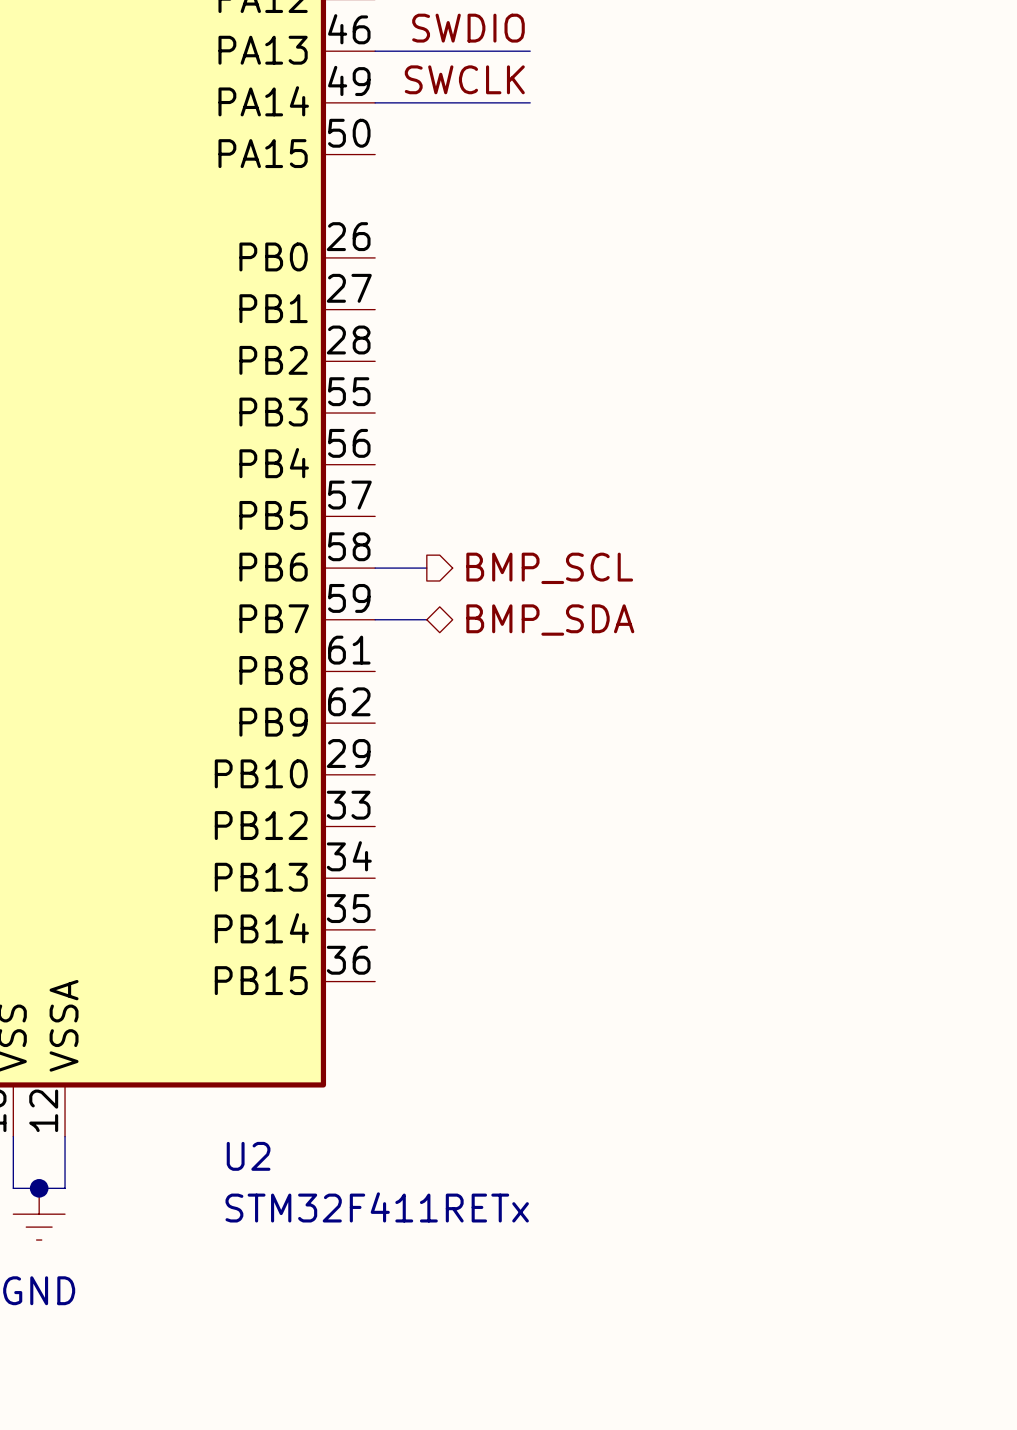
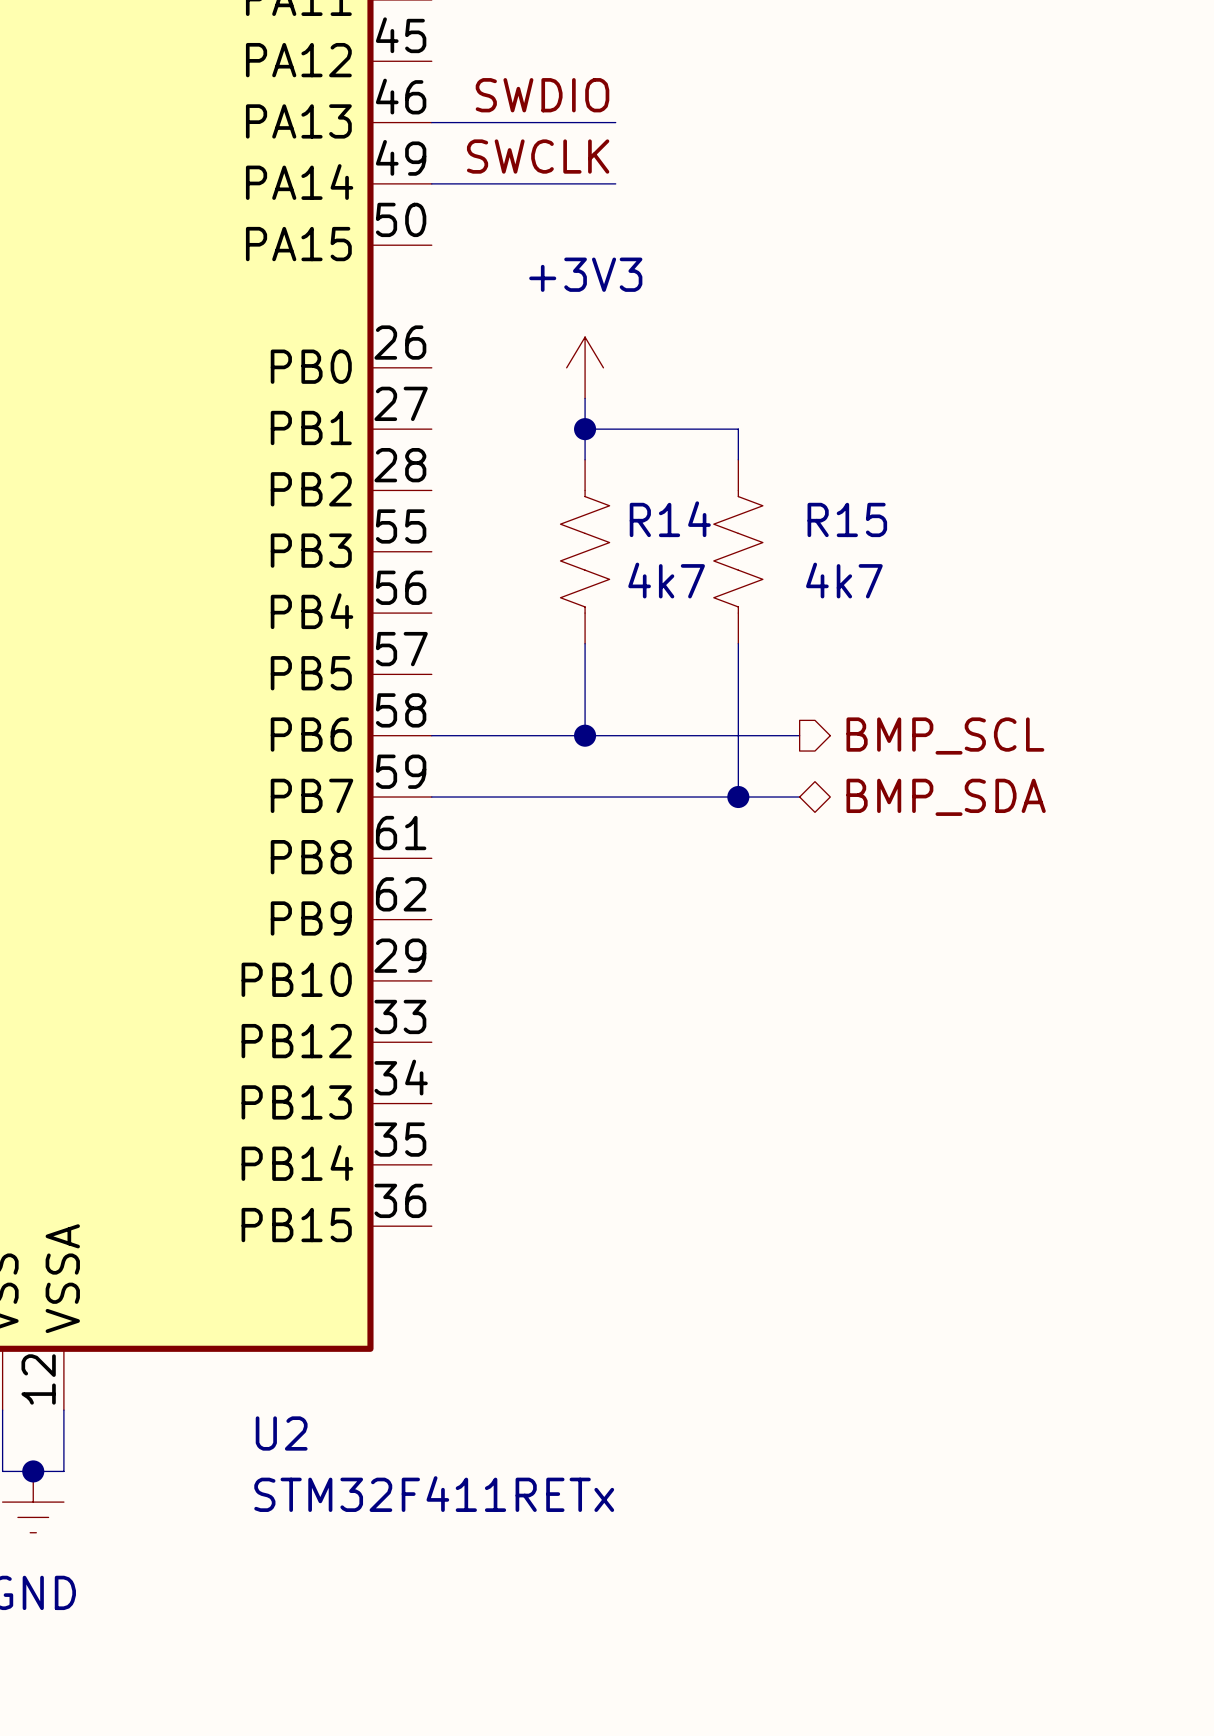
power symbol: none -> +3V3 (585, 367)
wire: none -> (585, 398) (585, 459)
wire: none -> (585, 429) (738, 429) (738, 459)
junction: none -> (585, 429)
R14: none -> 4k7 (585, 551)
R15: none -> 4k7 (738, 551)
wire: none -> (585, 643) (585, 735)
wire: none -> (738, 643) (738, 797)
wire: none -> (493, 735) (799, 735)
junction: none -> (585, 735)
hierarchical label position: BMP_SCL (549, 568) -> BMP_SCL (945, 736)
wire: none -> (493, 797) (799, 797)
junction: none -> (738, 797)
hierarchical label position: BMP_SDA (550, 620) -> BMP_SDA (946, 797)

